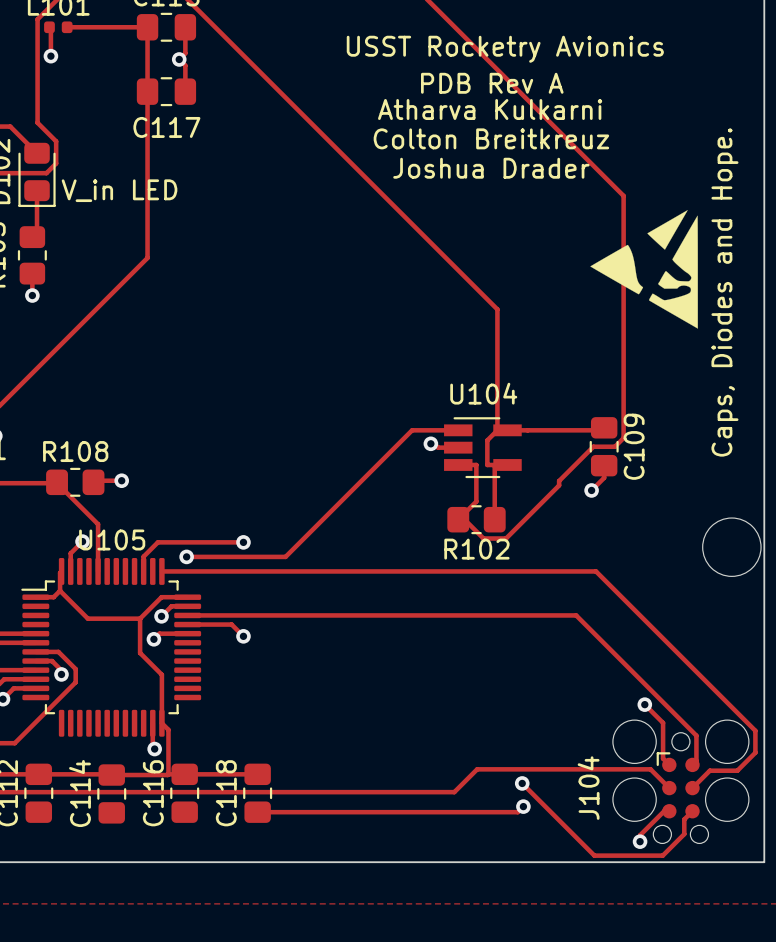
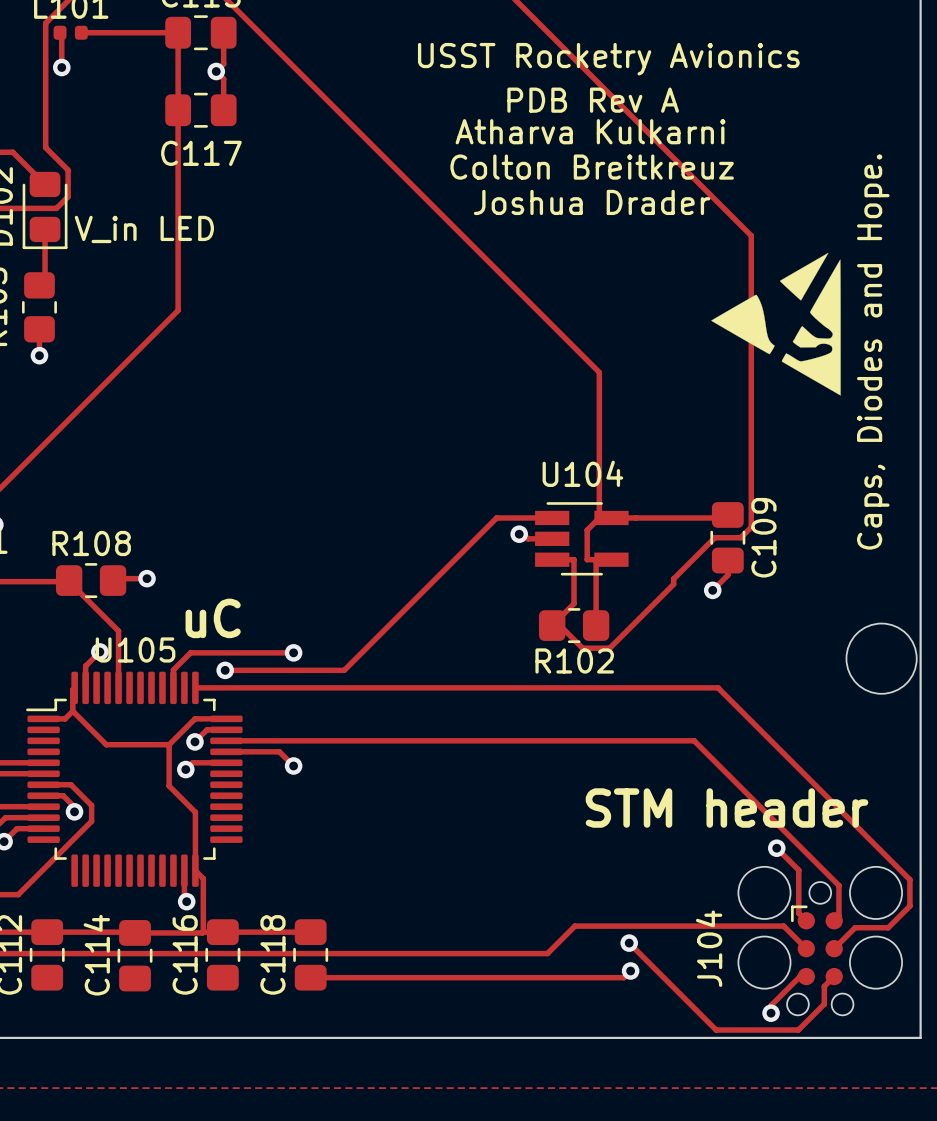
text: none -> uC (213, 618)
text: none -> STM header (727, 808)

